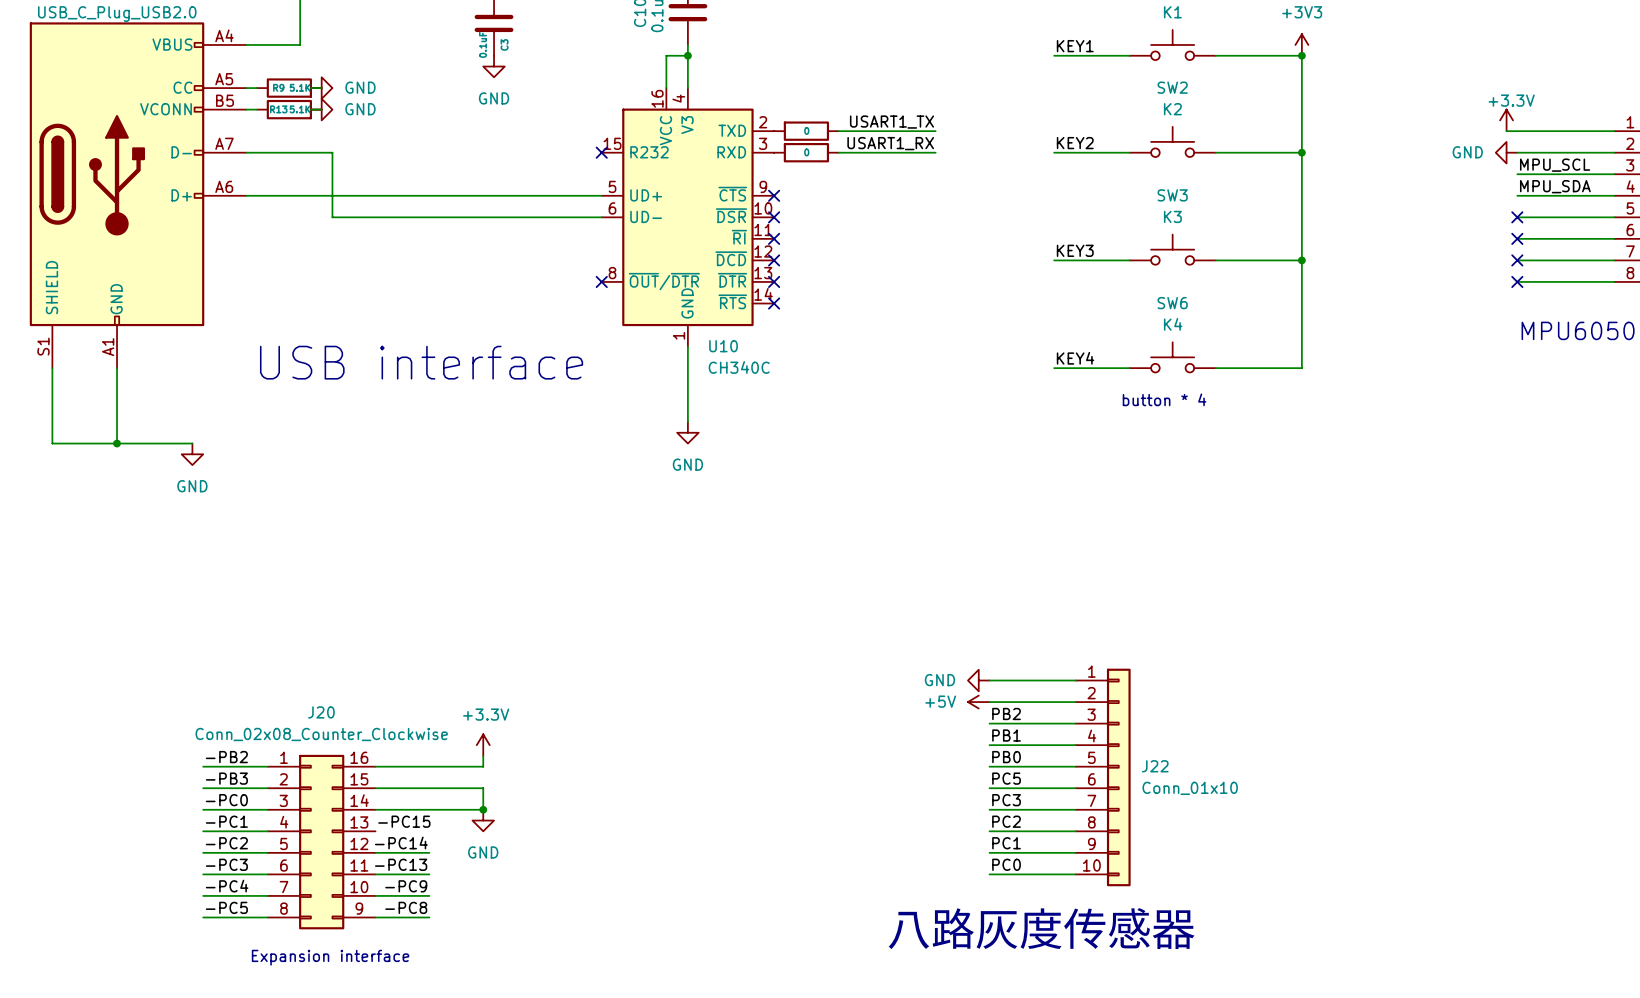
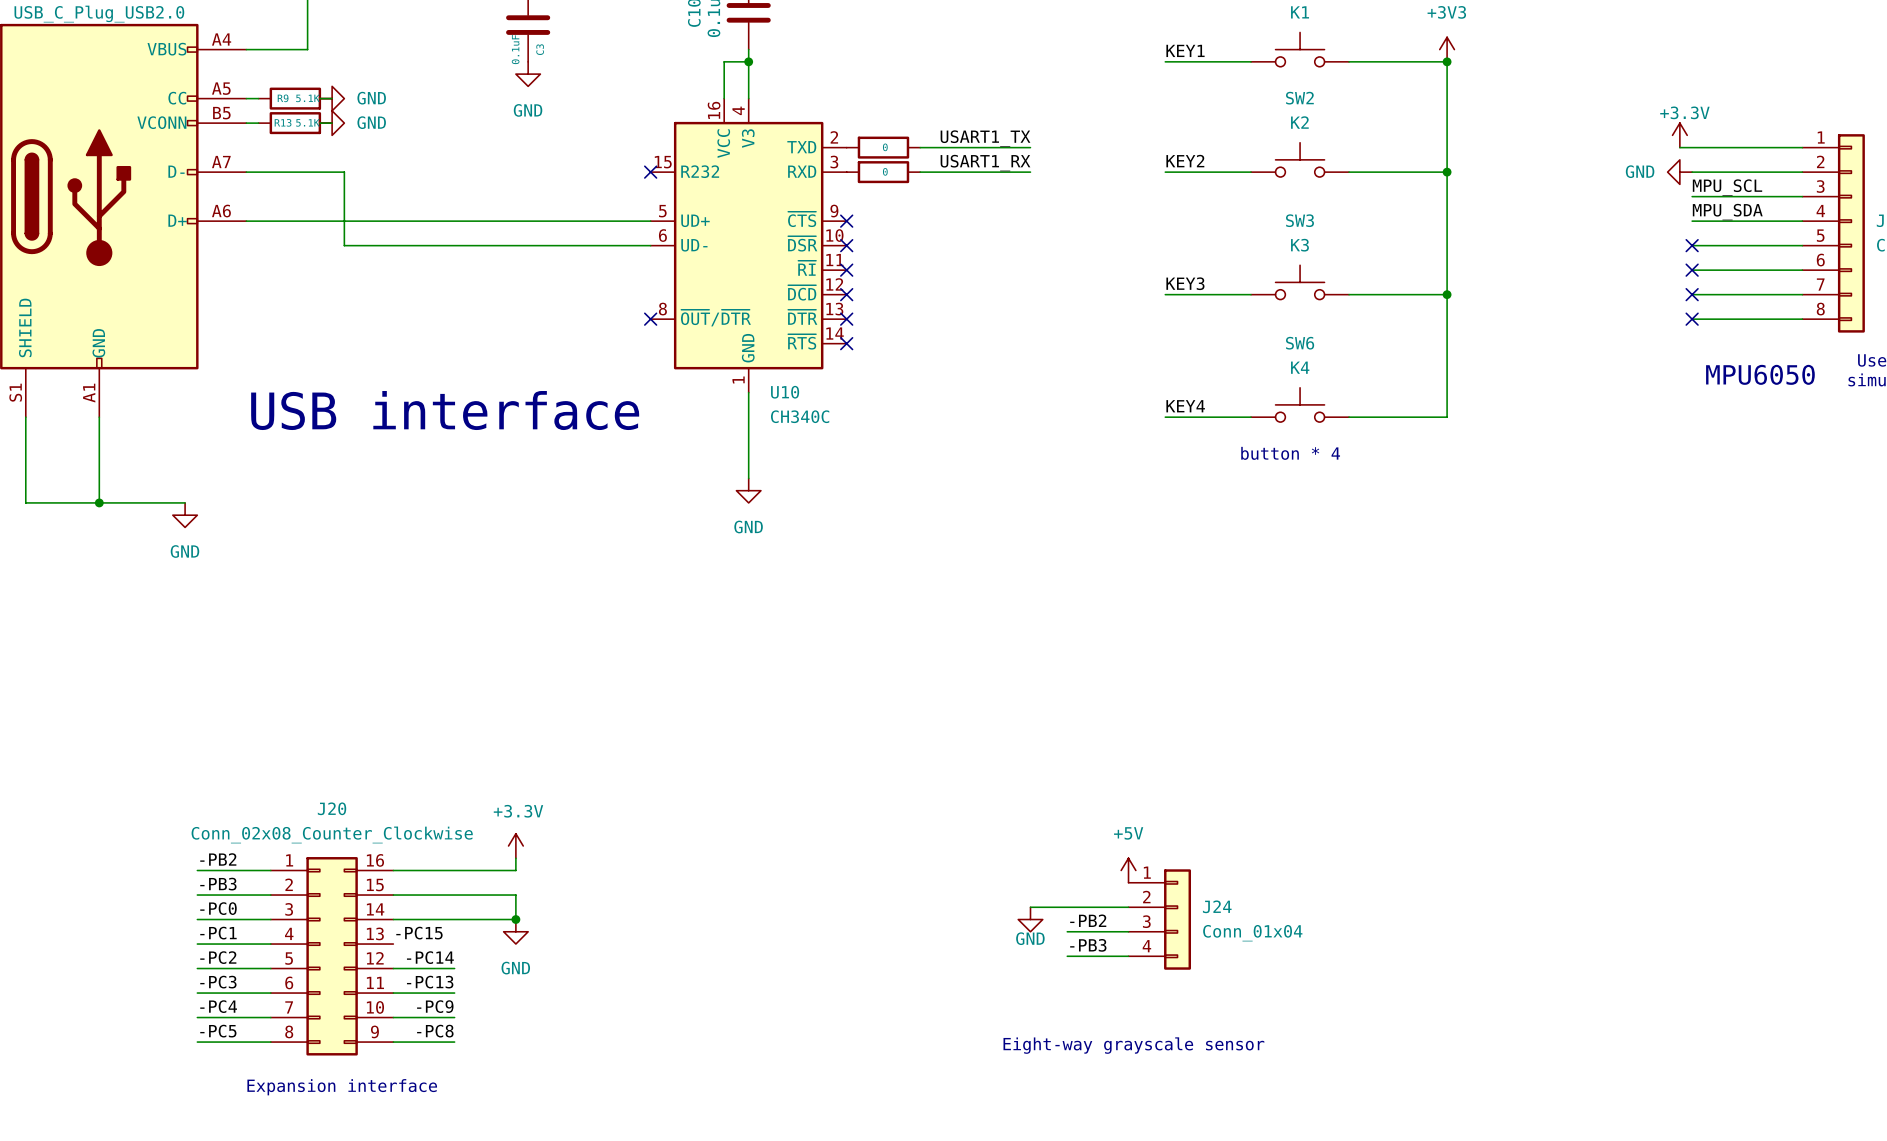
power symbol text position: GND (939, 680) -> GND (1030, 938)
power symbol rotation: 0° (978, 680) -> 90° counterclockwise (1030, 919)
power symbol position: GND (978, 680) -> GND (1030, 919)
wire: (989, 680) (1075, 680) -> none
power symbol rotation: 0° (978, 702) -> 90° clockwise (1128, 870)
power symbol position: +5V (978, 702) -> +5V (1128, 870)
wire: (989, 702) (1075, 702) -> none
label: PB2 (1006, 713) -> none
wire: (989, 723) (1075, 723) -> none
label: PB1 (1006, 735) -> none
wire: (989, 745) (1075, 745) -> none
label: PB0 (1006, 757) -> none
wire: (989, 766) (1075, 766) -> none
J22: Conn_01x10 (1103, 777) -> none
label: PC5 (1006, 778) -> none
wire: (989, 788) (1075, 788) -> none
label: PC3 (1006, 800) -> none
wire: (989, 809) (1075, 809) -> (1030, 907) (1128, 907)
J24: none -> Conn_01x04 (1159, 919)
label: none -> -PB2 (1088, 920)
wire: none -> (1067, 931) (1128, 931)
label: PC2 (1006, 821) -> none
wire: (989, 831) (1075, 831) -> none
label: none -> -PB3 (1088, 945)
wire: none -> (1067, 956) (1128, 956)
label: PC1 (1006, 843) -> none
wire: (989, 852) (1075, 852) -> none
label: PC0 (1006, 864) -> none
wire: (989, 874) (1075, 874) -> none
text: none -> Eight-way grayscale sensor (1133, 1045)
text: 八路灰度传感器 (1041, 928) -> none

